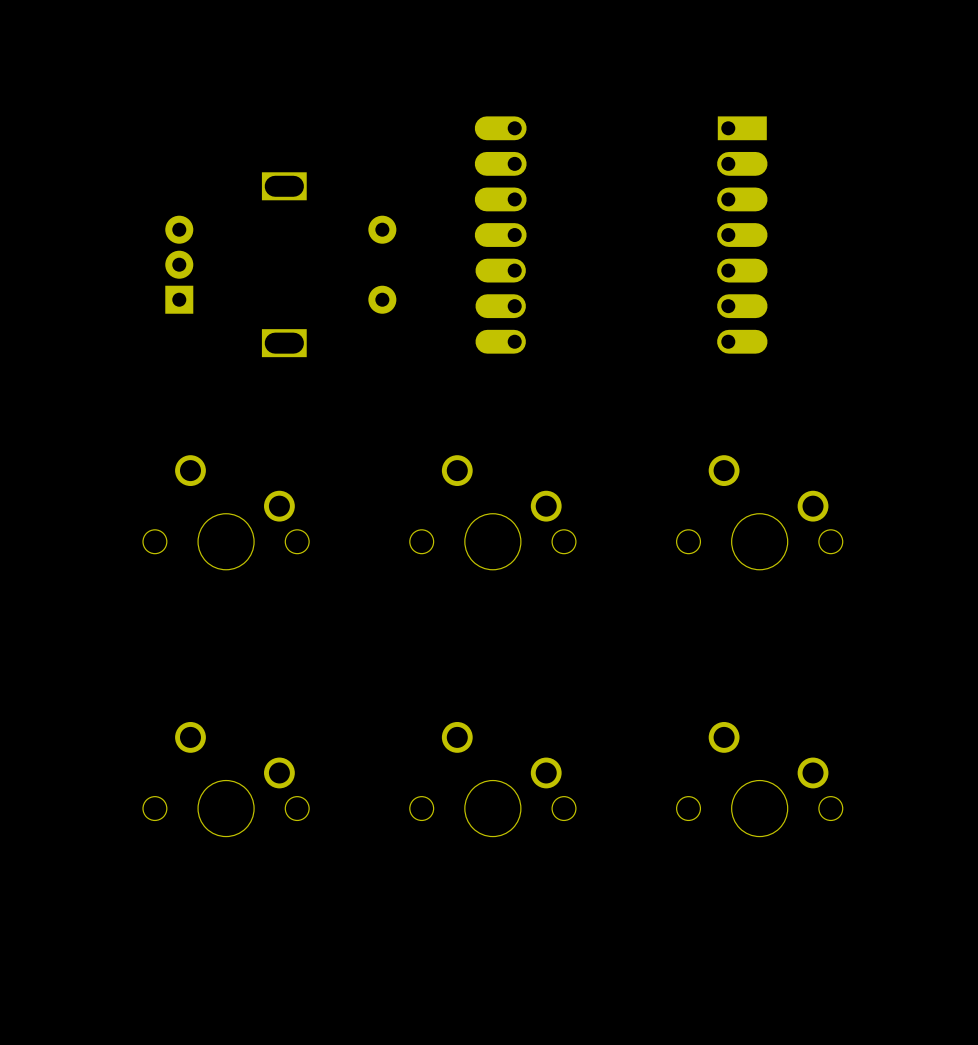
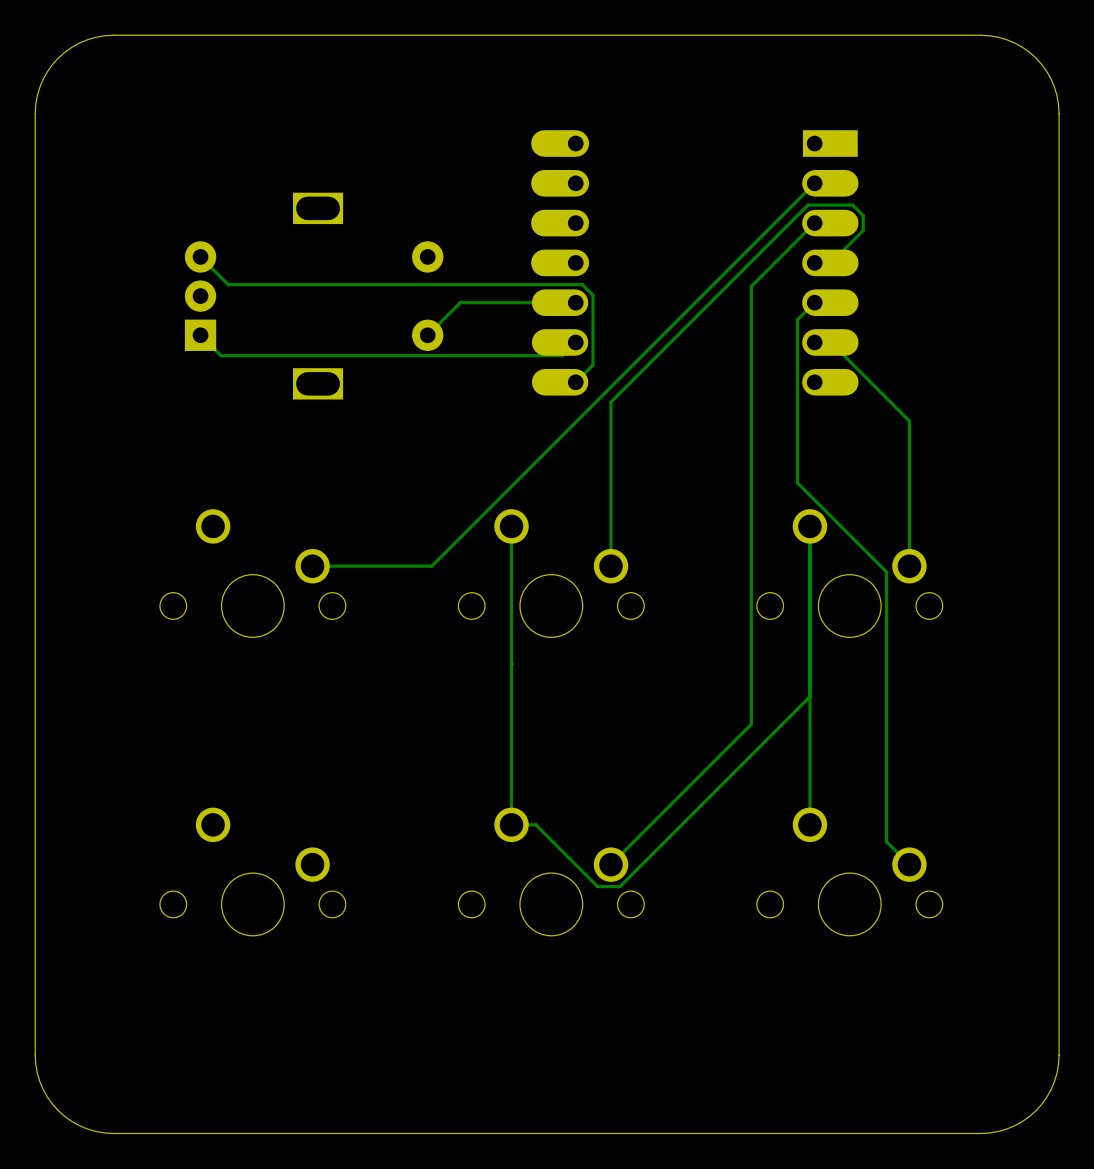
board edge: none -> (980, 35) (113, 35) (96, 37) (79, 43) (64, 52) (52, 64) (39, 87) (35, 113) (35, 1055) (37, 1072) (43, 1089) (52, 1103) (64, 1116) (87, 1129) (113, 1133) (980, 1133) (998, 1131) (1014, 1125) (1029, 1116) (1041, 1103) (1054, 1081) (1059, 1055) (1058, 104) (1054, 87) (1047, 71) (1029, 52) (1006, 39) (980, 35)
track: none -> (814, 183) (431, 566) (312, 566)
track: none -> (814, 223) (751, 286) (751, 724) (611, 864)
track: none -> (200, 256) (228, 284) (582, 284) (592, 295) (592, 365) (575, 382)
track: none -> (814, 262) (830, 262) (863, 230) (863, 215) (852, 205) (807, 205) (611, 402) (611, 566)
track: none -> (575, 302) (460, 302) (427, 335)
track: none -> (814, 302) (797, 319) (797, 482) (886, 572) (886, 841) (909, 864)
track: none -> (200, 335) (220, 355) (562, 355) (575, 342)
track: none -> (814, 342) (830, 342) (909, 421) (909, 566)
track: none -> (511, 526) (511, 824) (535, 824) (597, 886) (620, 886) (809, 696)
track: none -> (809, 526) (809, 824)

